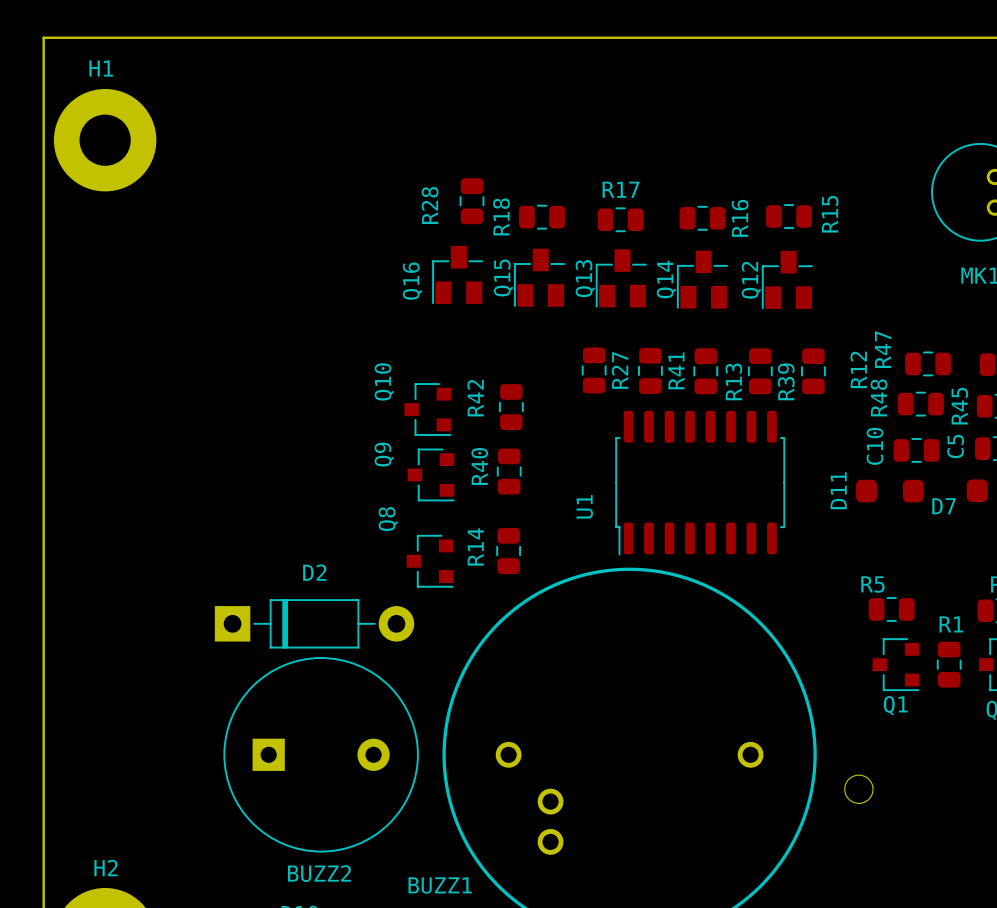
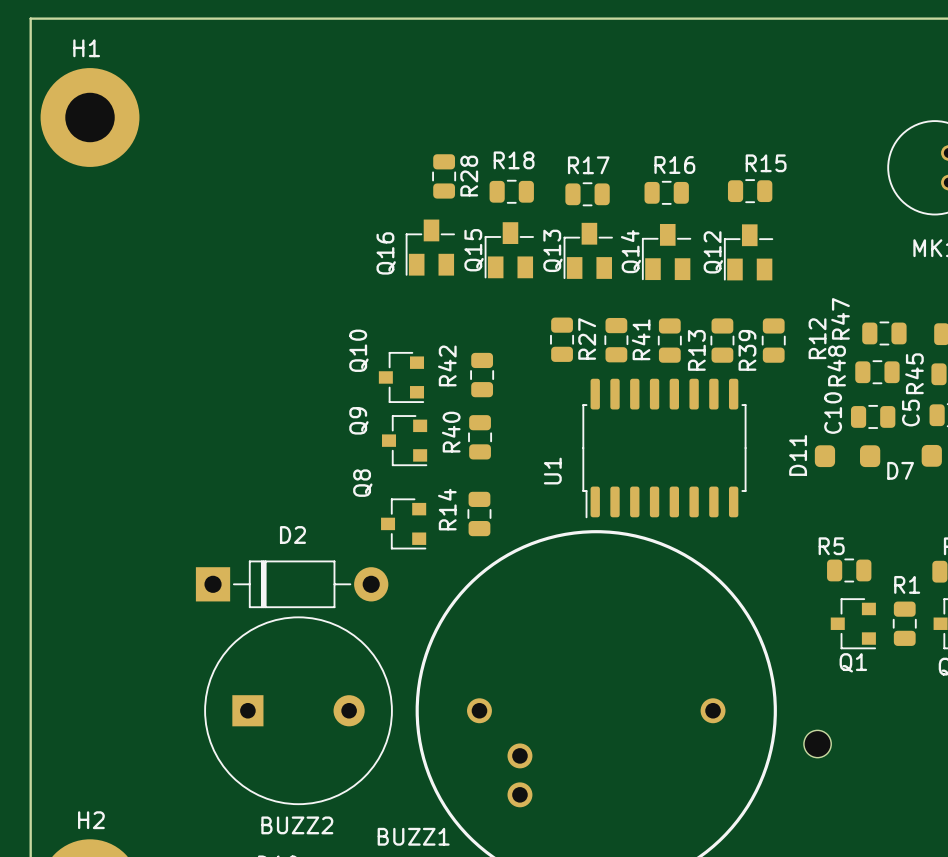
R28 name position: R28 (430, 205) -> R28 (469, 176)
R15 name rotation: 0° (830, 214) -> 90° clockwise (766, 163)
R18 name rotation: 0° (501, 216) -> 90° clockwise (514, 160)
R16 name rotation: 0° (740, 218) -> 90° clockwise (674, 165)

